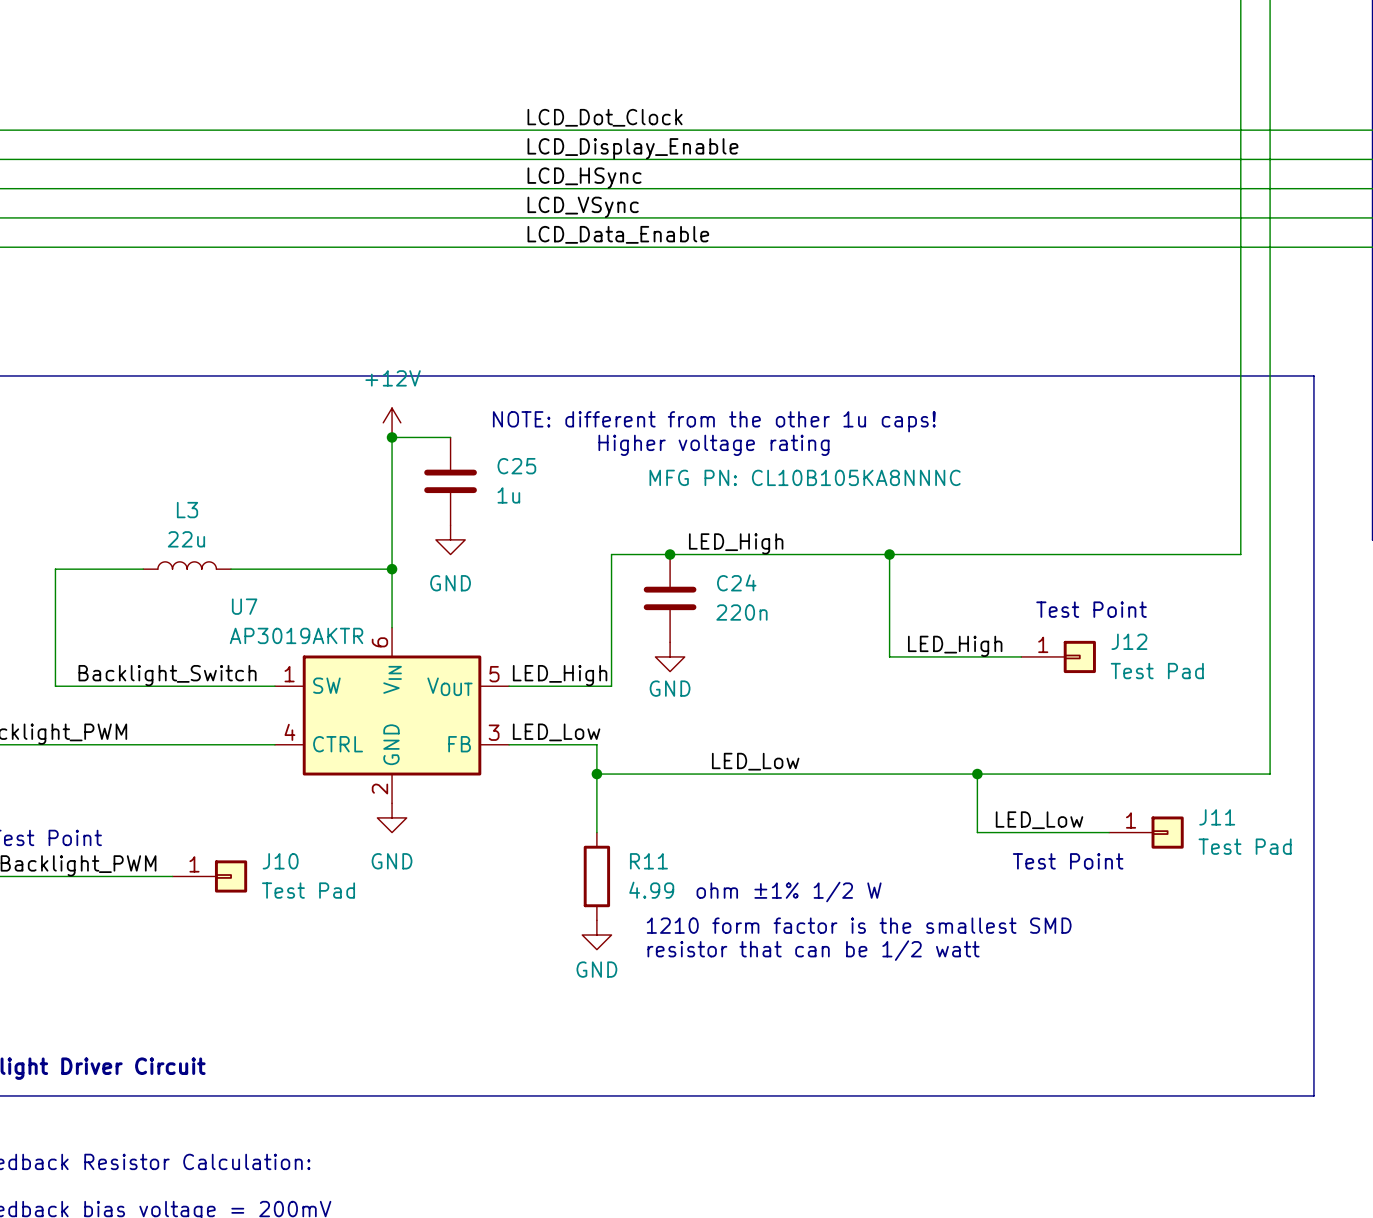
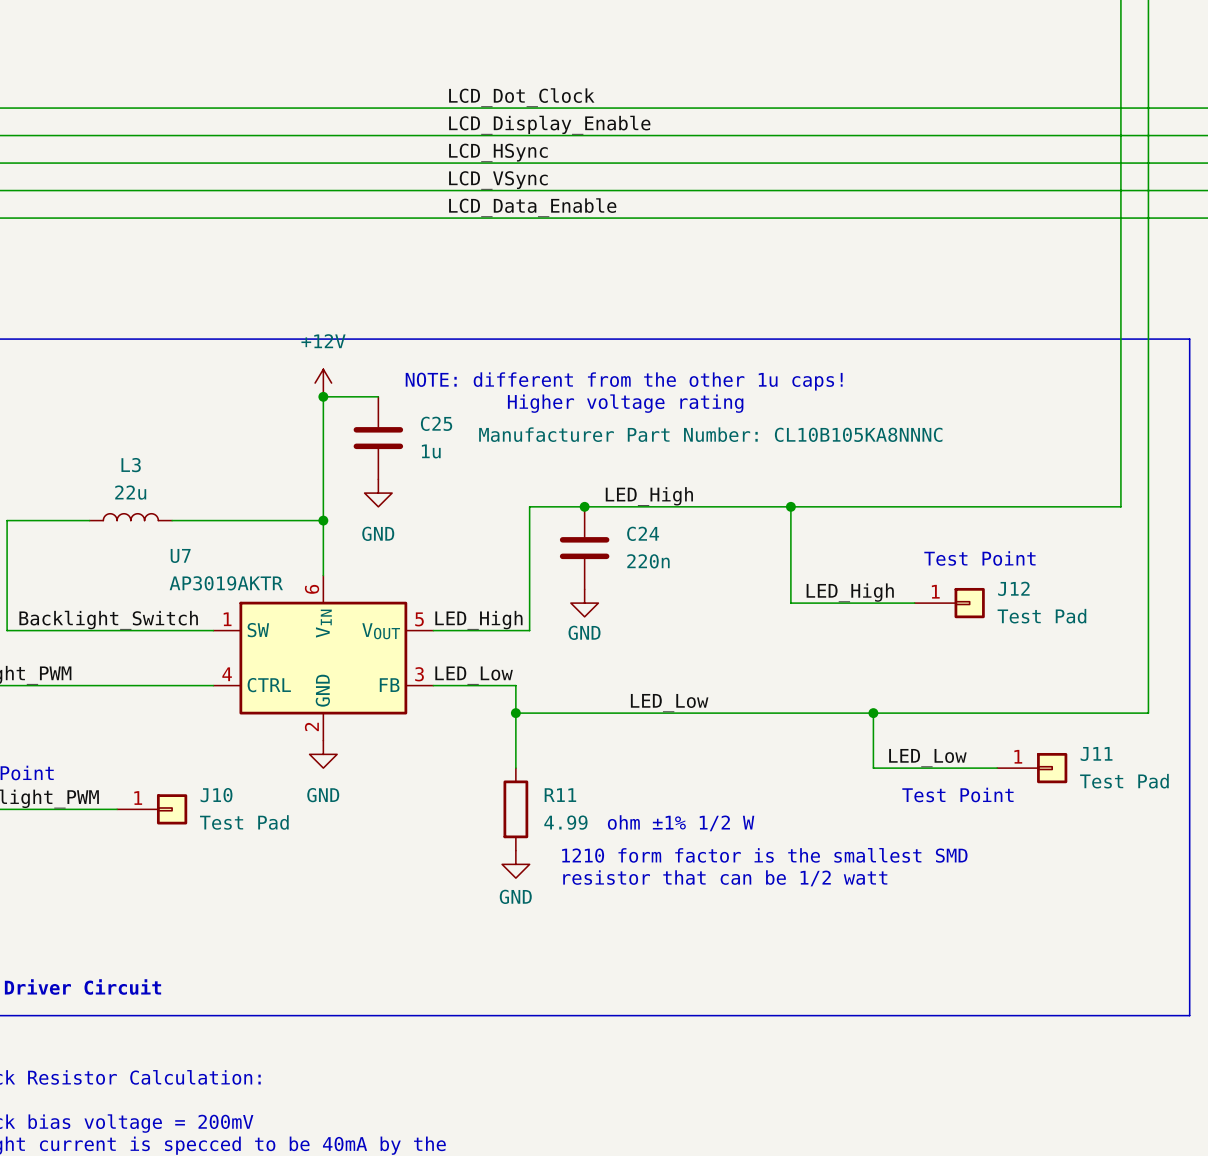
C25 text: MFG PN: CL10B105KA8NNNC (805, 477) -> none
C25 text: none -> Manufacturer Part Number: CL10B105KA8NNNC (710, 434)

